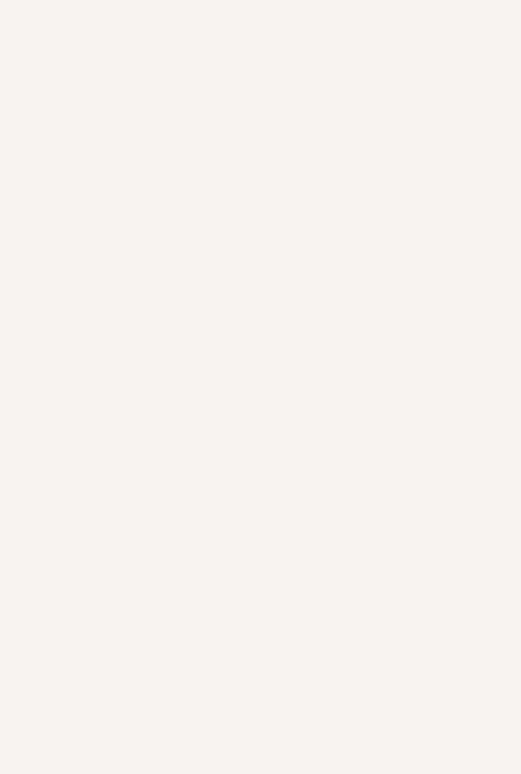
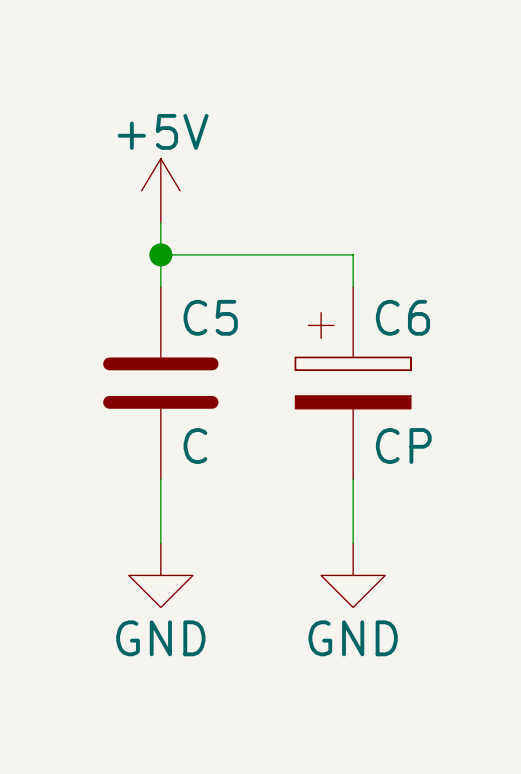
power symbol: none -> +5V (160, 190)
wire: none -> (160, 222) (160, 286)
wire: none -> (160, 254) (353, 254) (353, 286)
junction: none -> (160, 254)
C5: none -> C (160, 383)
C6: none -> CP (353, 383)
wire: none -> (160, 479) (160, 543)
wire: none -> (353, 479) (353, 543)
power symbol: none -> GND (160, 575)
power symbol: none -> GND (353, 575)

